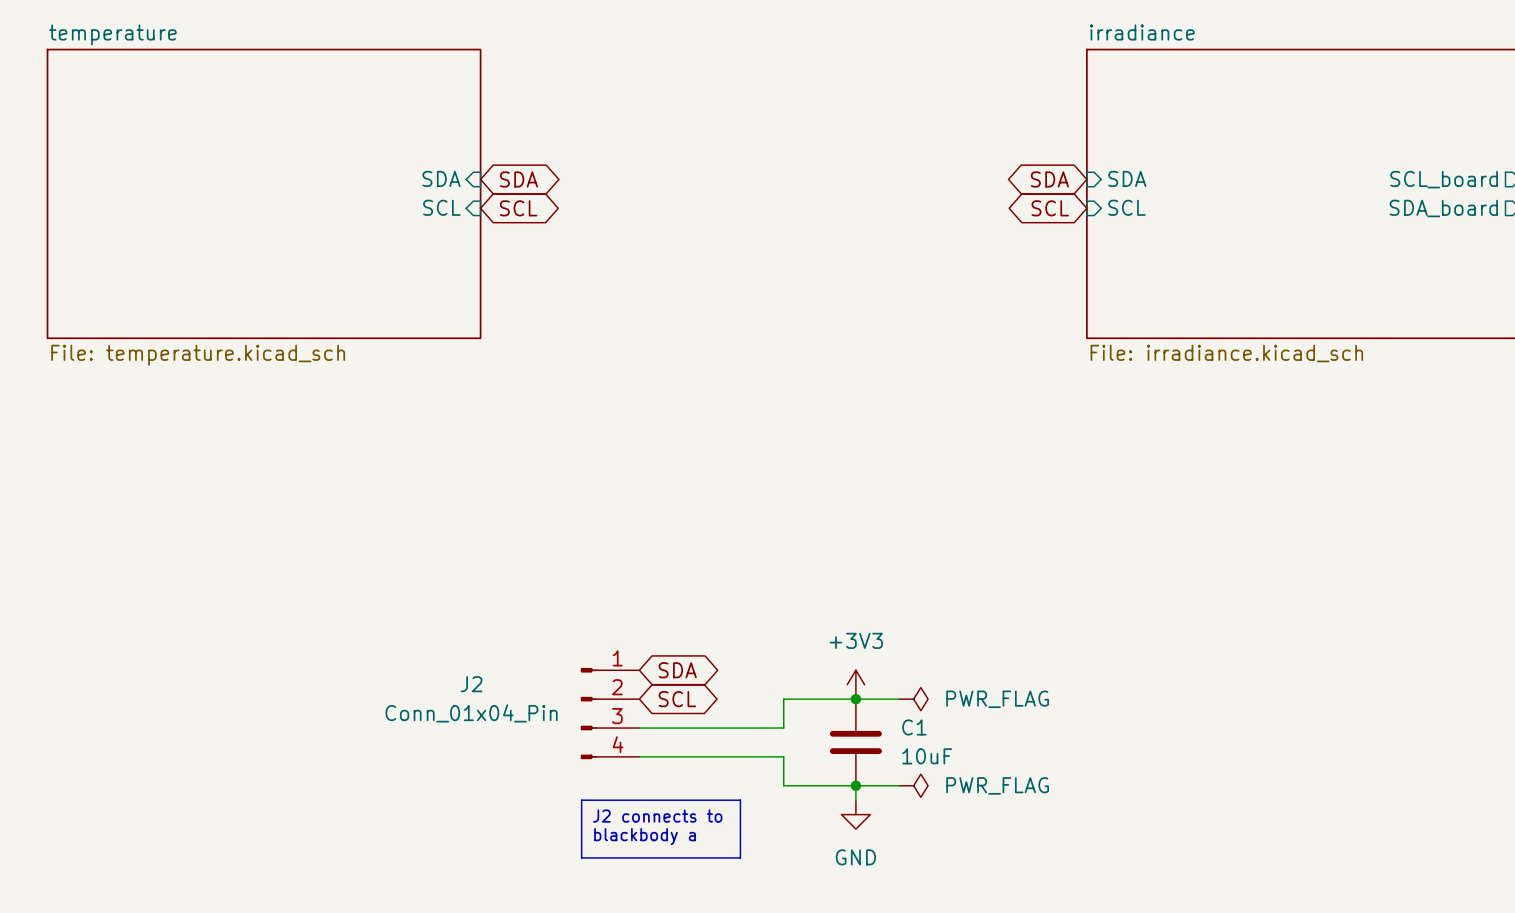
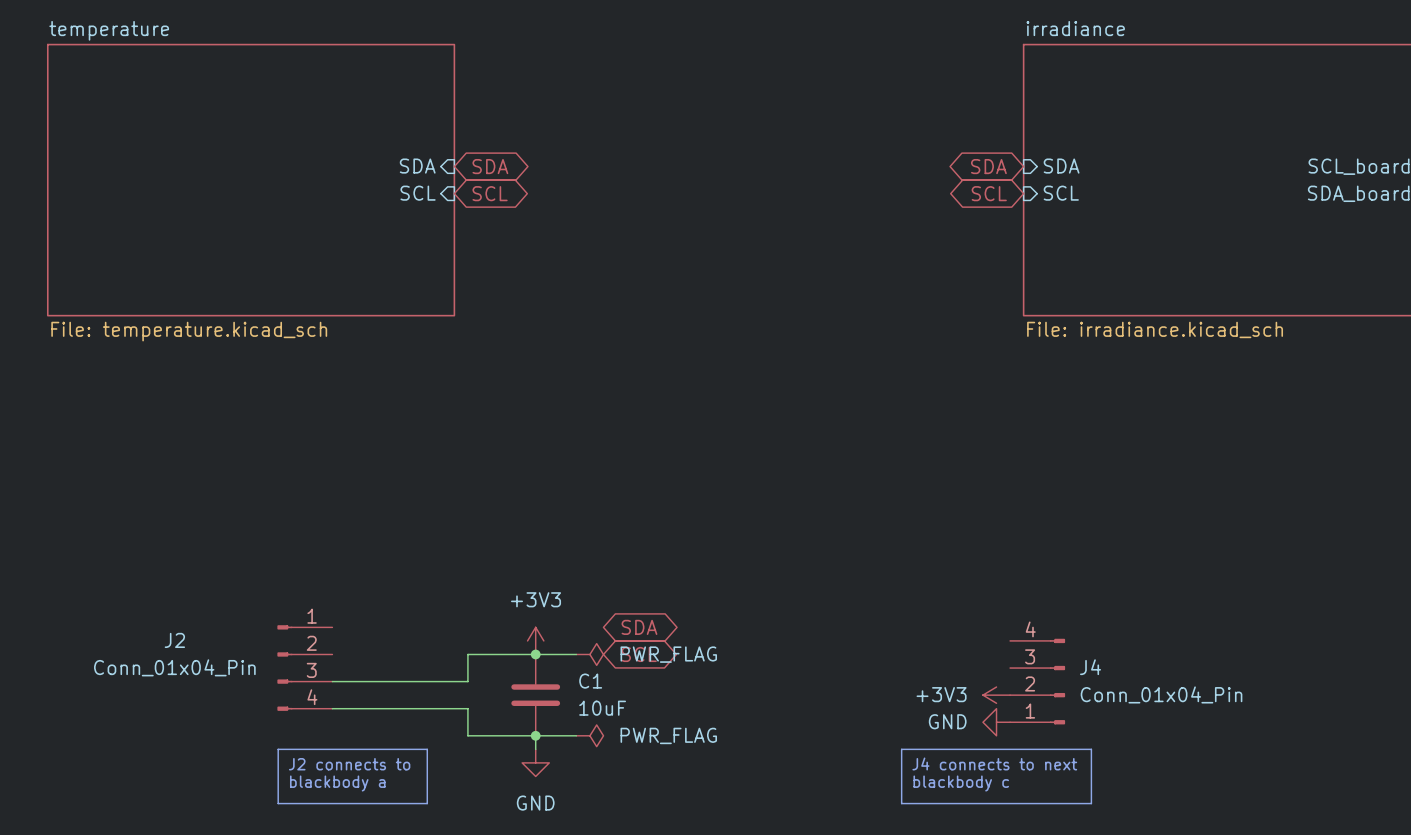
power symbol: none -> +3V3 (535, 640)
power symbol: +3V3 (855, 684) -> none
junction: none -> (535, 654)
wire: none -> (576, 654) (467, 654) (467, 681) (332, 681)
power symbol: none -> PWR_FLAG (589, 654)
junction: (855, 699) -> none
wire: (899, 699) (783, 699) (783, 728) (639, 728) -> none
power symbol: PWR_FLAG (913, 699) -> none
J2 position: (610, 713) -> (304, 668)
J4: none -> Conn_01x04_Pin (1037, 681)
C1 position: (855, 742) -> (535, 695)
power symbol: none -> +3V3 (996, 695)
wire: none -> (332, 708) (467, 708) (467, 735) (576, 735)
wire: (639, 756) (783, 756) (783, 785) (899, 785) -> none
power symbol: none -> GND (996, 722)
wire: none -> (535, 735) (535, 749)
junction: none -> (535, 735)
power symbol: none -> PWR_FLAG (589, 735)
wire: (855, 785) (855, 800) -> none
junction: (855, 785) -> none
power symbol: PWR_FLAG (913, 785) -> none
line: none -> (278, 749) (427, 749) (427, 803) (278, 803) (278, 749)
line: (581, 800) (740, 800) (740, 857) (581, 857) (581, 800) -> none
line: none -> (901, 749) (1091, 749) (1091, 803) (901, 803) (901, 749)
power symbol: none -> GND (535, 762)
power symbol: GND (855, 814) -> none
text: none -> J4 connects to next (994, 763)
text: none -> J2 connects to (349, 764)
text: J2 connects to (657, 816) -> none
text: none -> blackbody a (337, 783)
text: blackbody a (645, 836) -> none
text: none -> blackbody c (961, 783)

